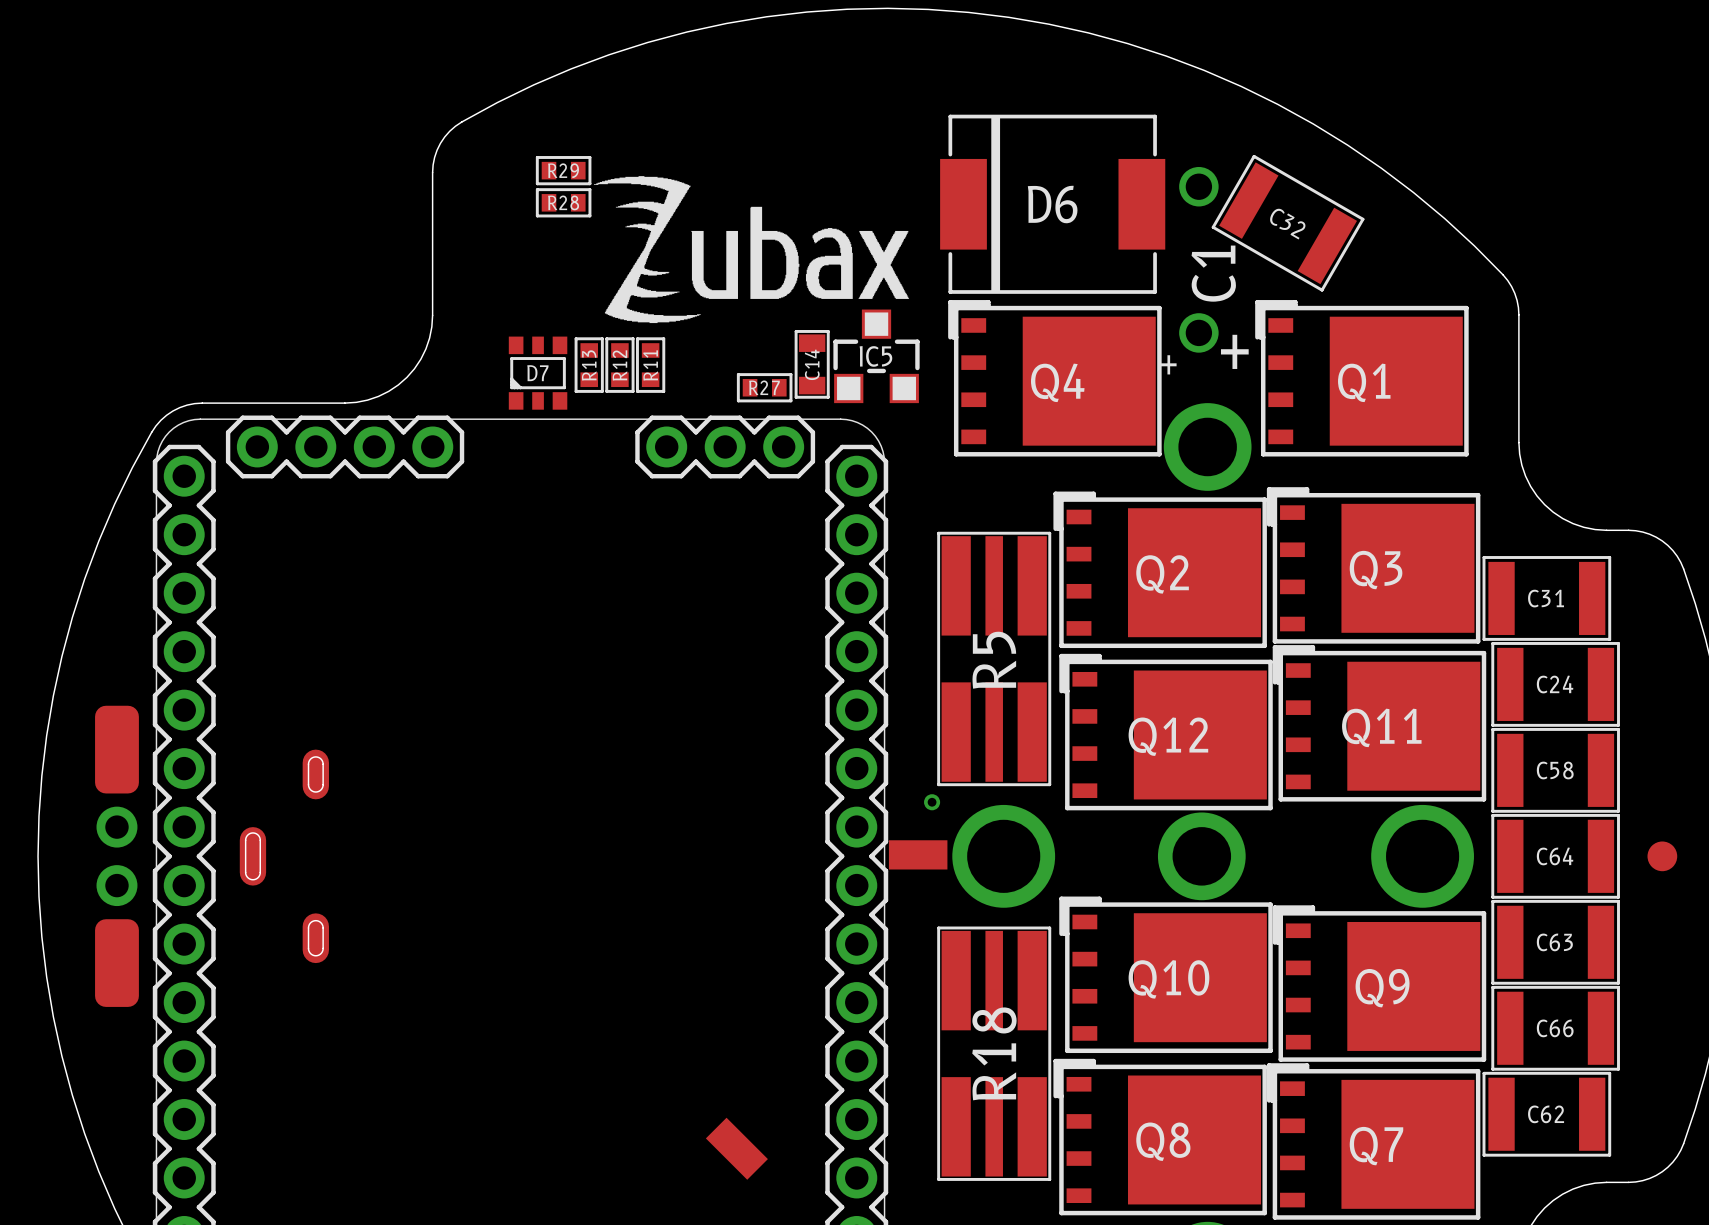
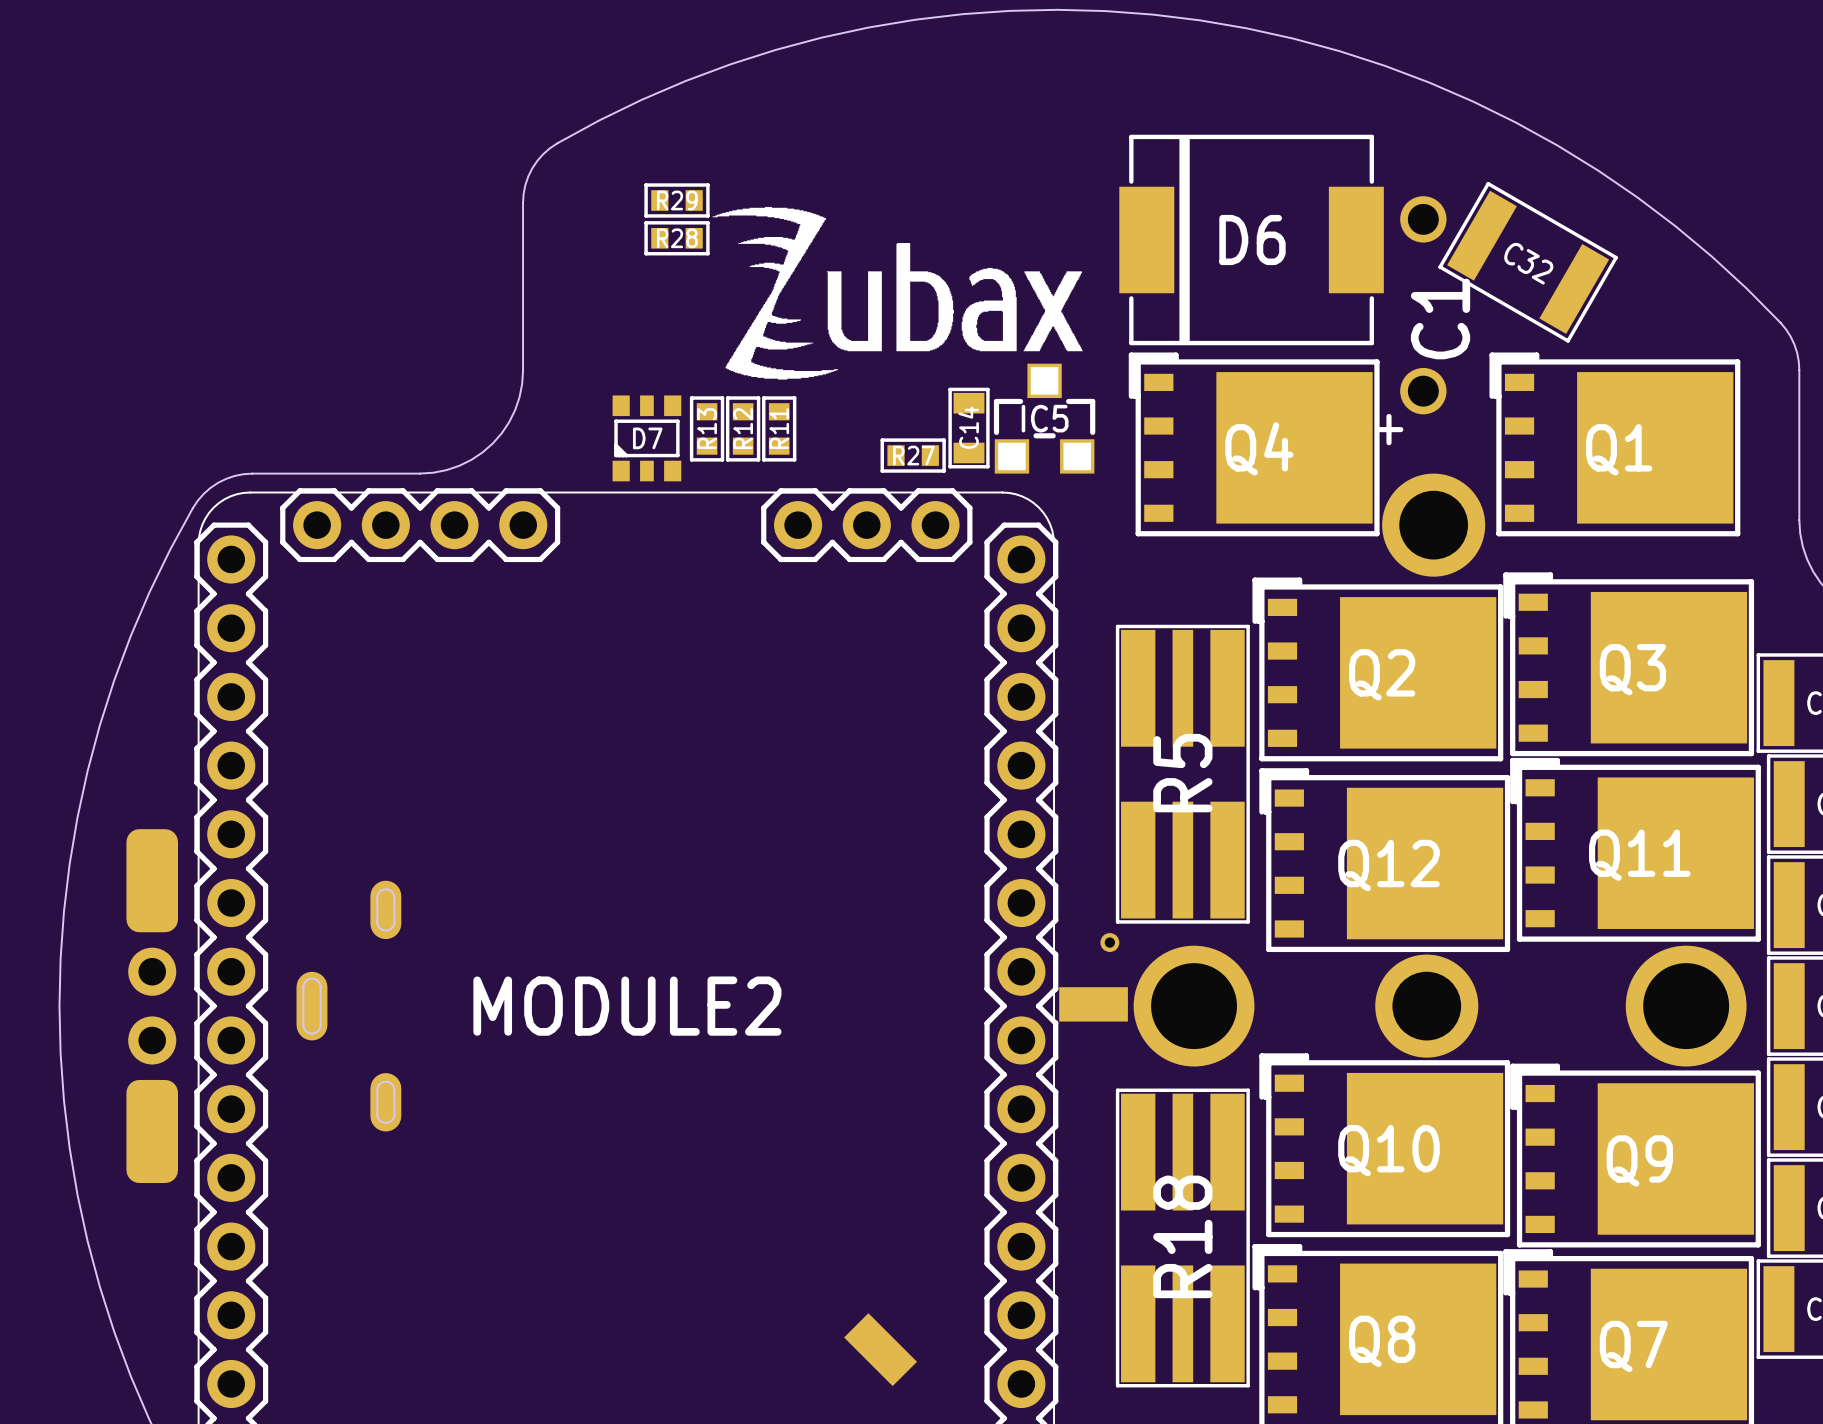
text: + (1234, 351) -> none
MODULE2 name: none -> MODULE2 (627, 1006)

